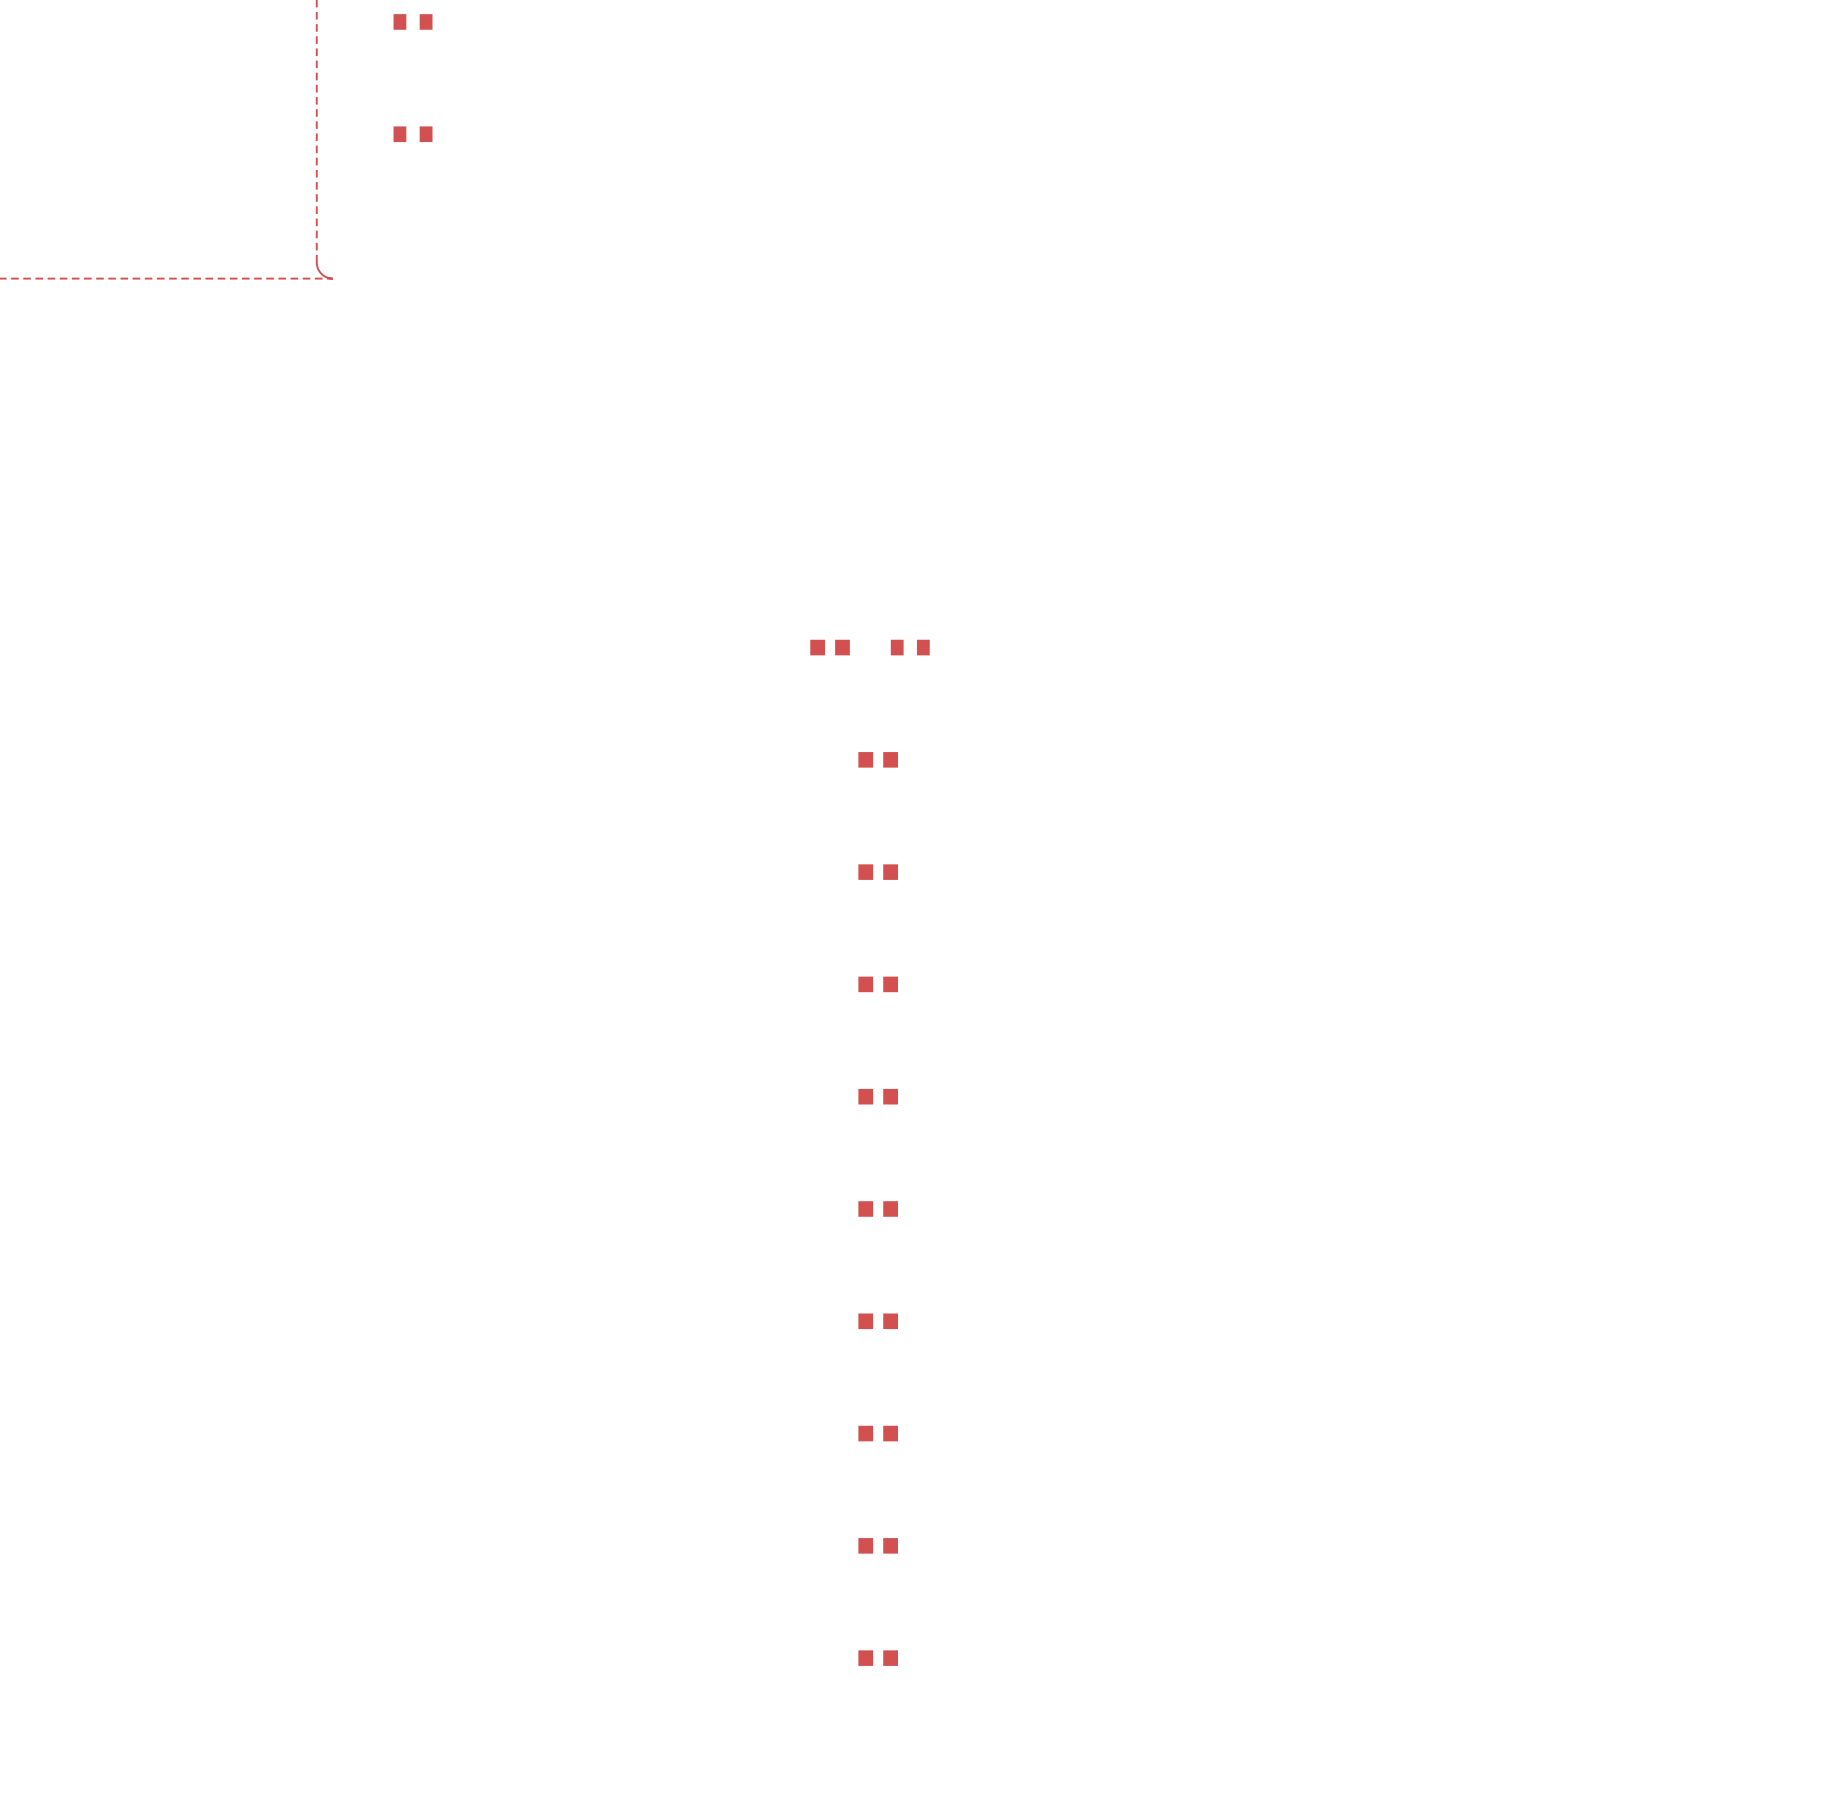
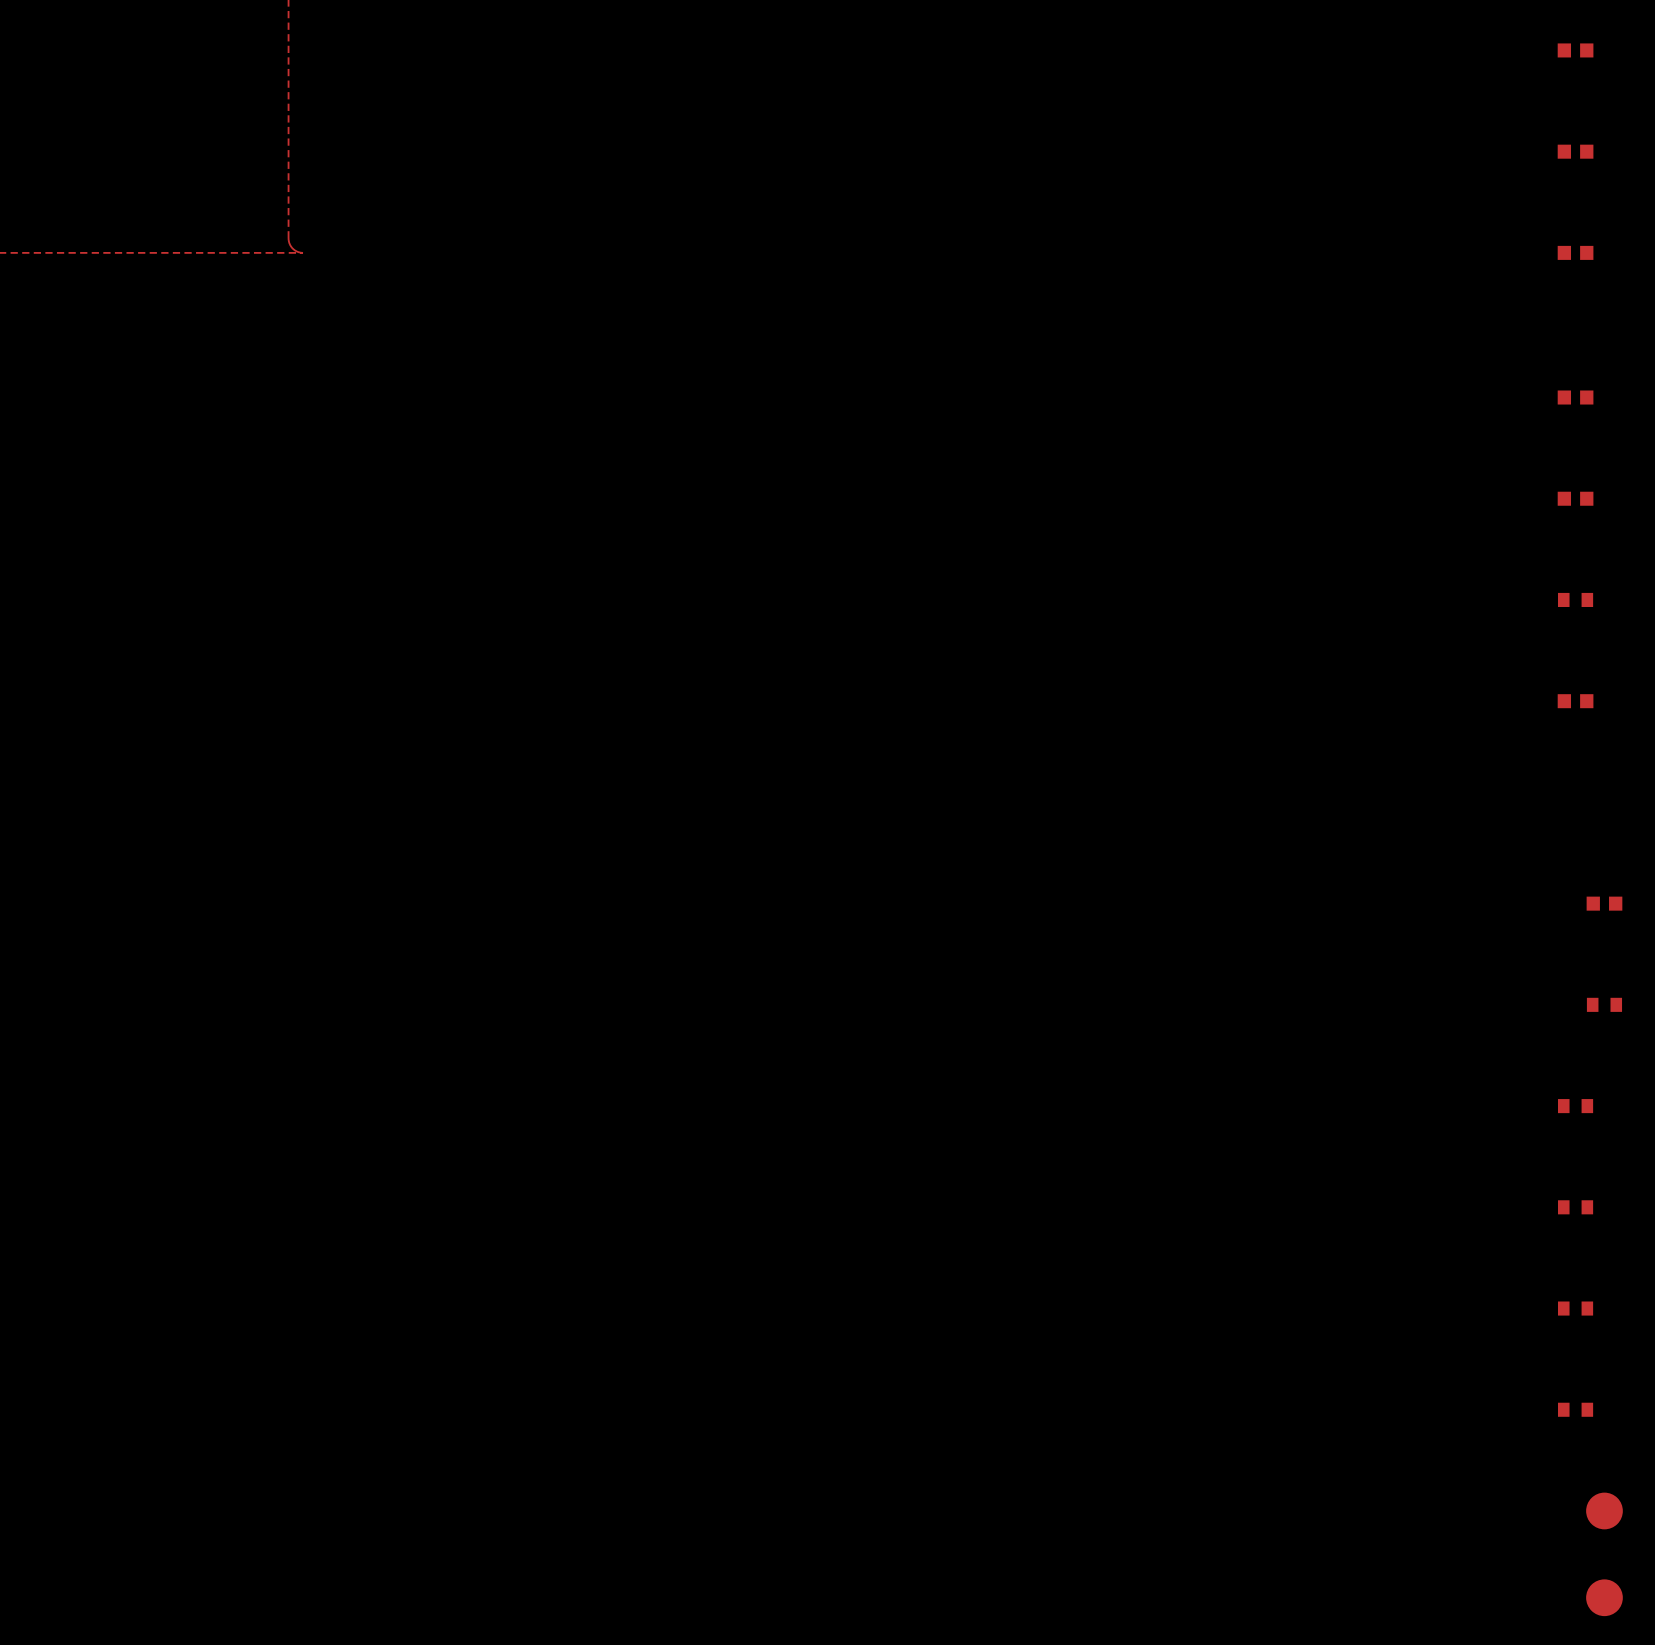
part: (413, 21) -> none
part: none -> (1575, 50)
part: (413, 134) -> none
part: none -> (1575, 151)
part: none -> (1575, 252)
part: none -> (1575, 397)
part: none -> (1575, 498)
part: (830, 647) -> none
part: (910, 647) -> none
part: none -> (1575, 599)
part: (878, 759) -> none
part: none -> (1575, 701)
part: (878, 872) -> none
part: (878, 984) -> none
part: none -> (1604, 903)
part: (878, 1096) -> none
part: none -> (1604, 1004)
part: (878, 1208) -> none
part: none -> (1575, 1106)
part: (878, 1321) -> none
part: none -> (1575, 1207)
part: (878, 1433) -> none
part: none -> (1575, 1308)
part: (878, 1545) -> none
part: none -> (1575, 1409)
part: (878, 1658) -> none
part: none -> (1604, 1510)
part: none -> (1604, 1597)

